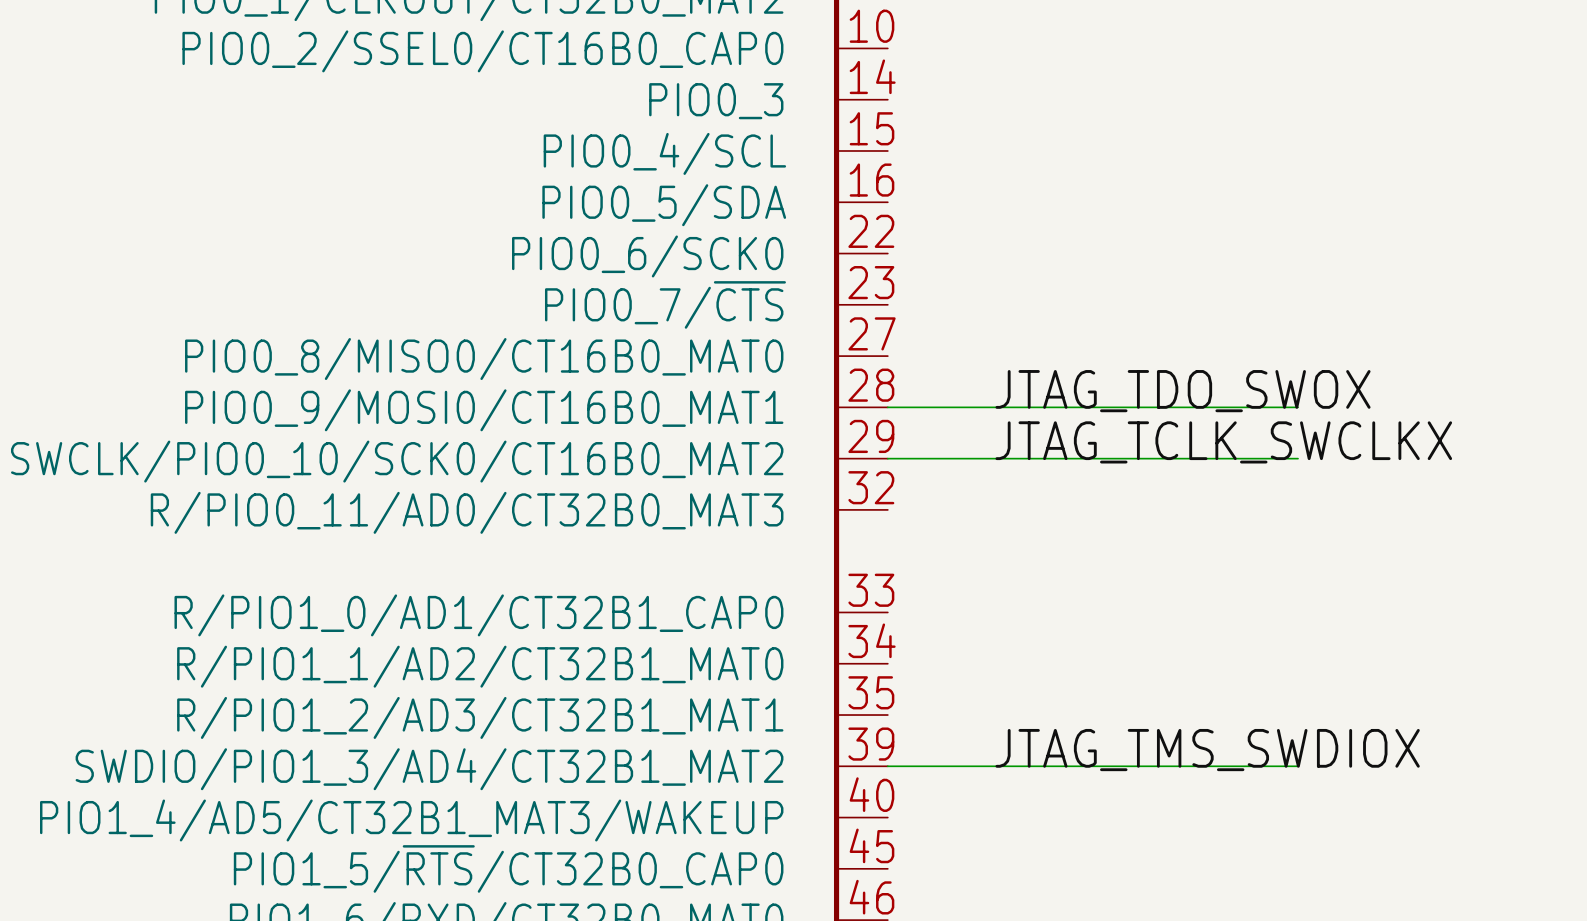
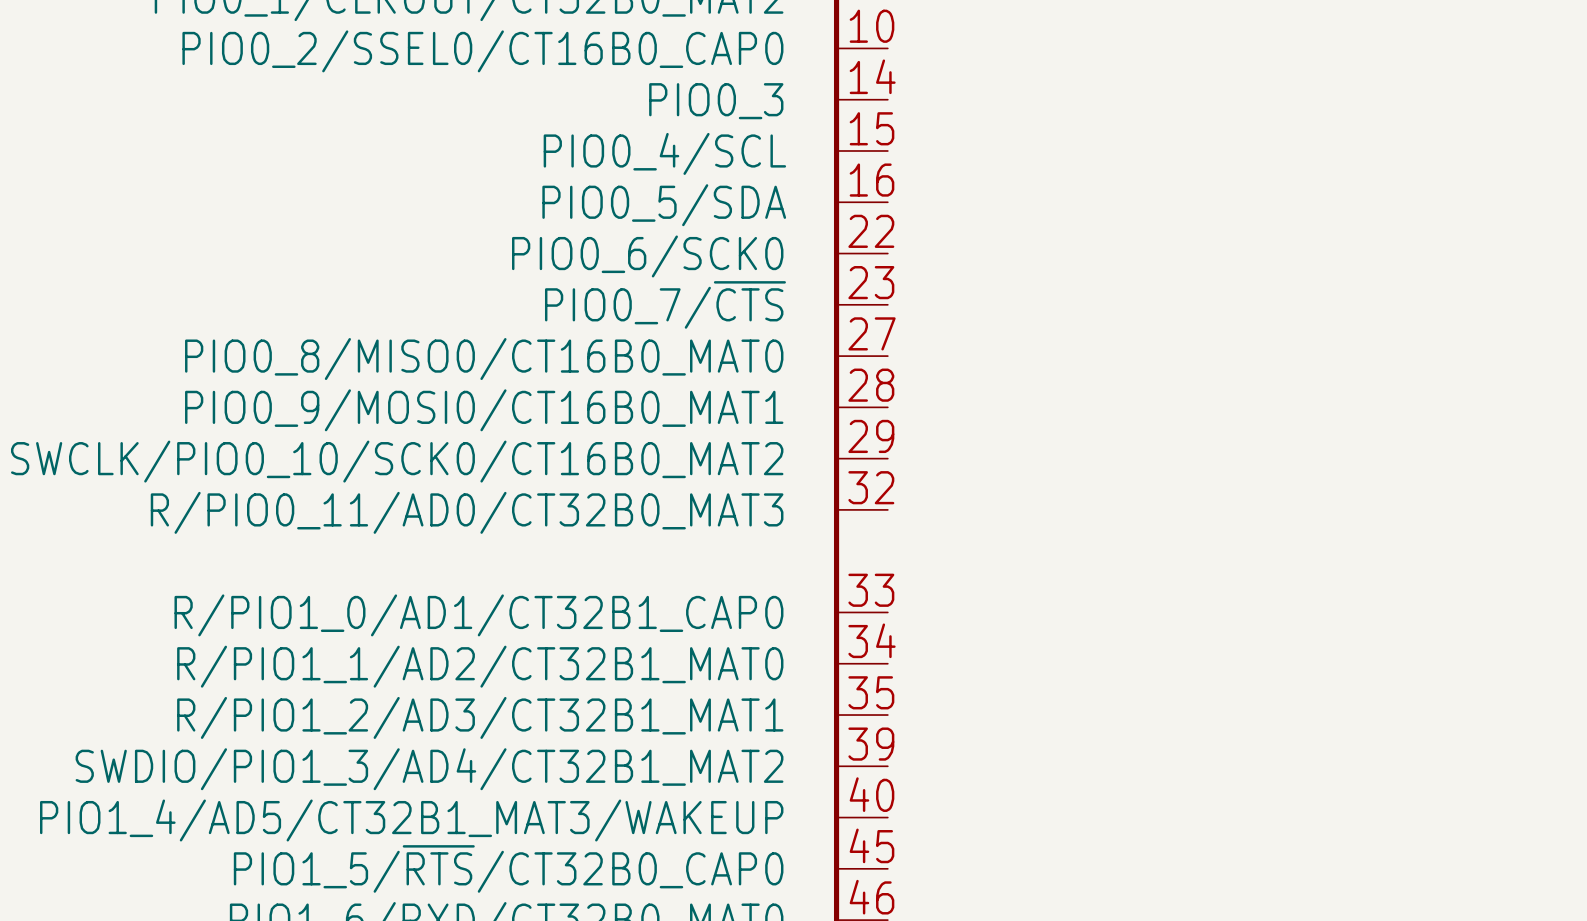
label: JTAG_TDO_SWOX (1183, 391) -> none
wire: (887, 407) (1298, 407) -> none
label: JTAG_TCLK_SWCLKX (1223, 442) -> none
wire: (887, 458) (1298, 458) -> none
label: JTAG_TMS_SWDIOX (1207, 750) -> none
wire: (887, 766) (1298, 766) -> none

